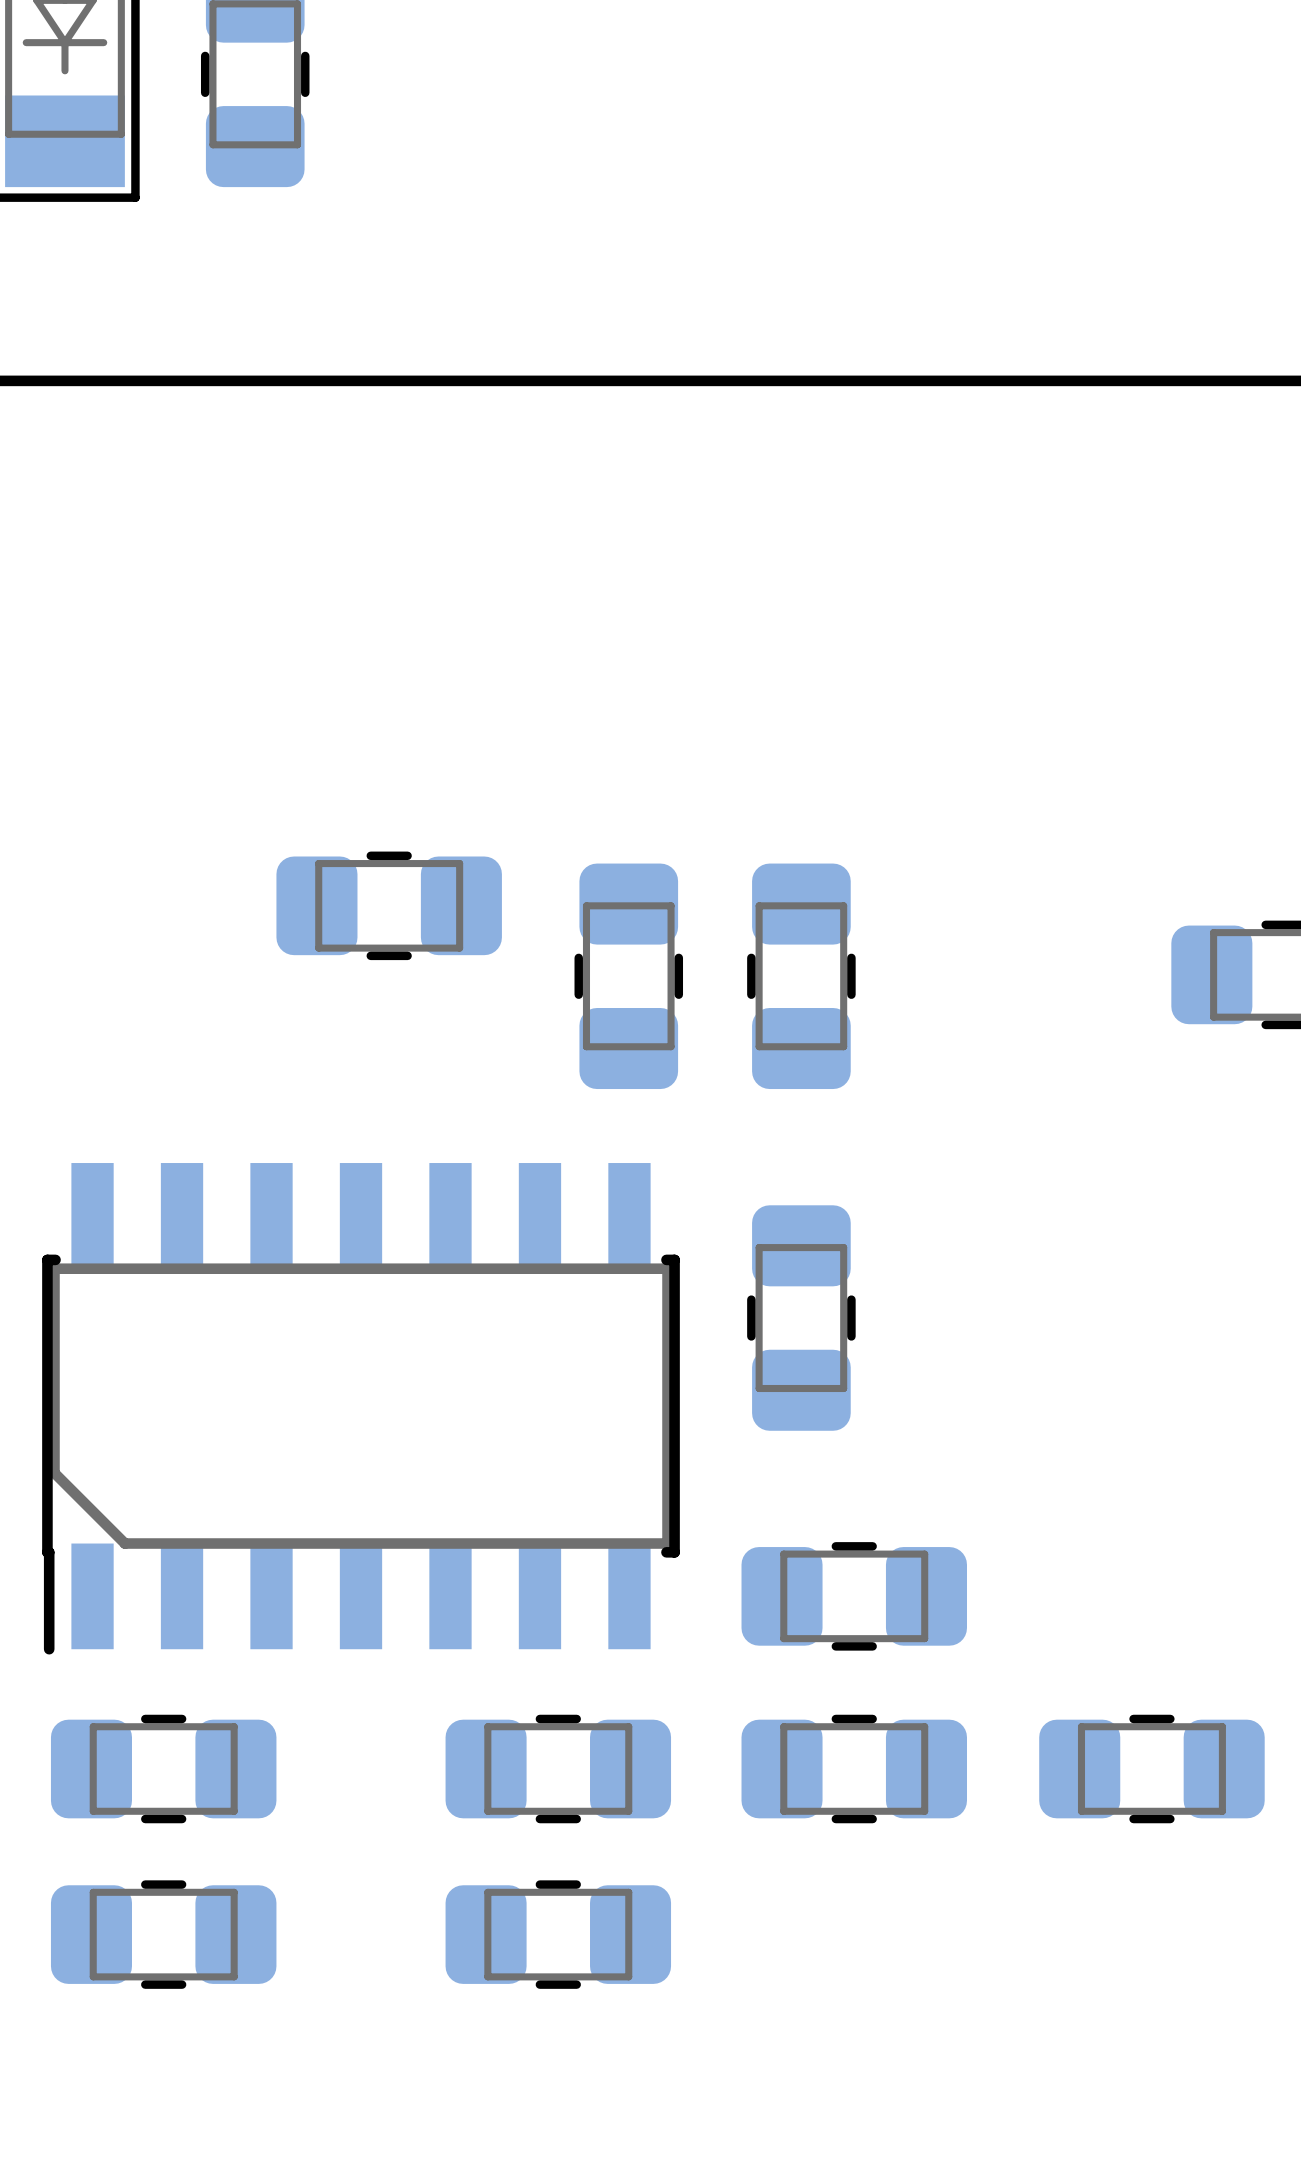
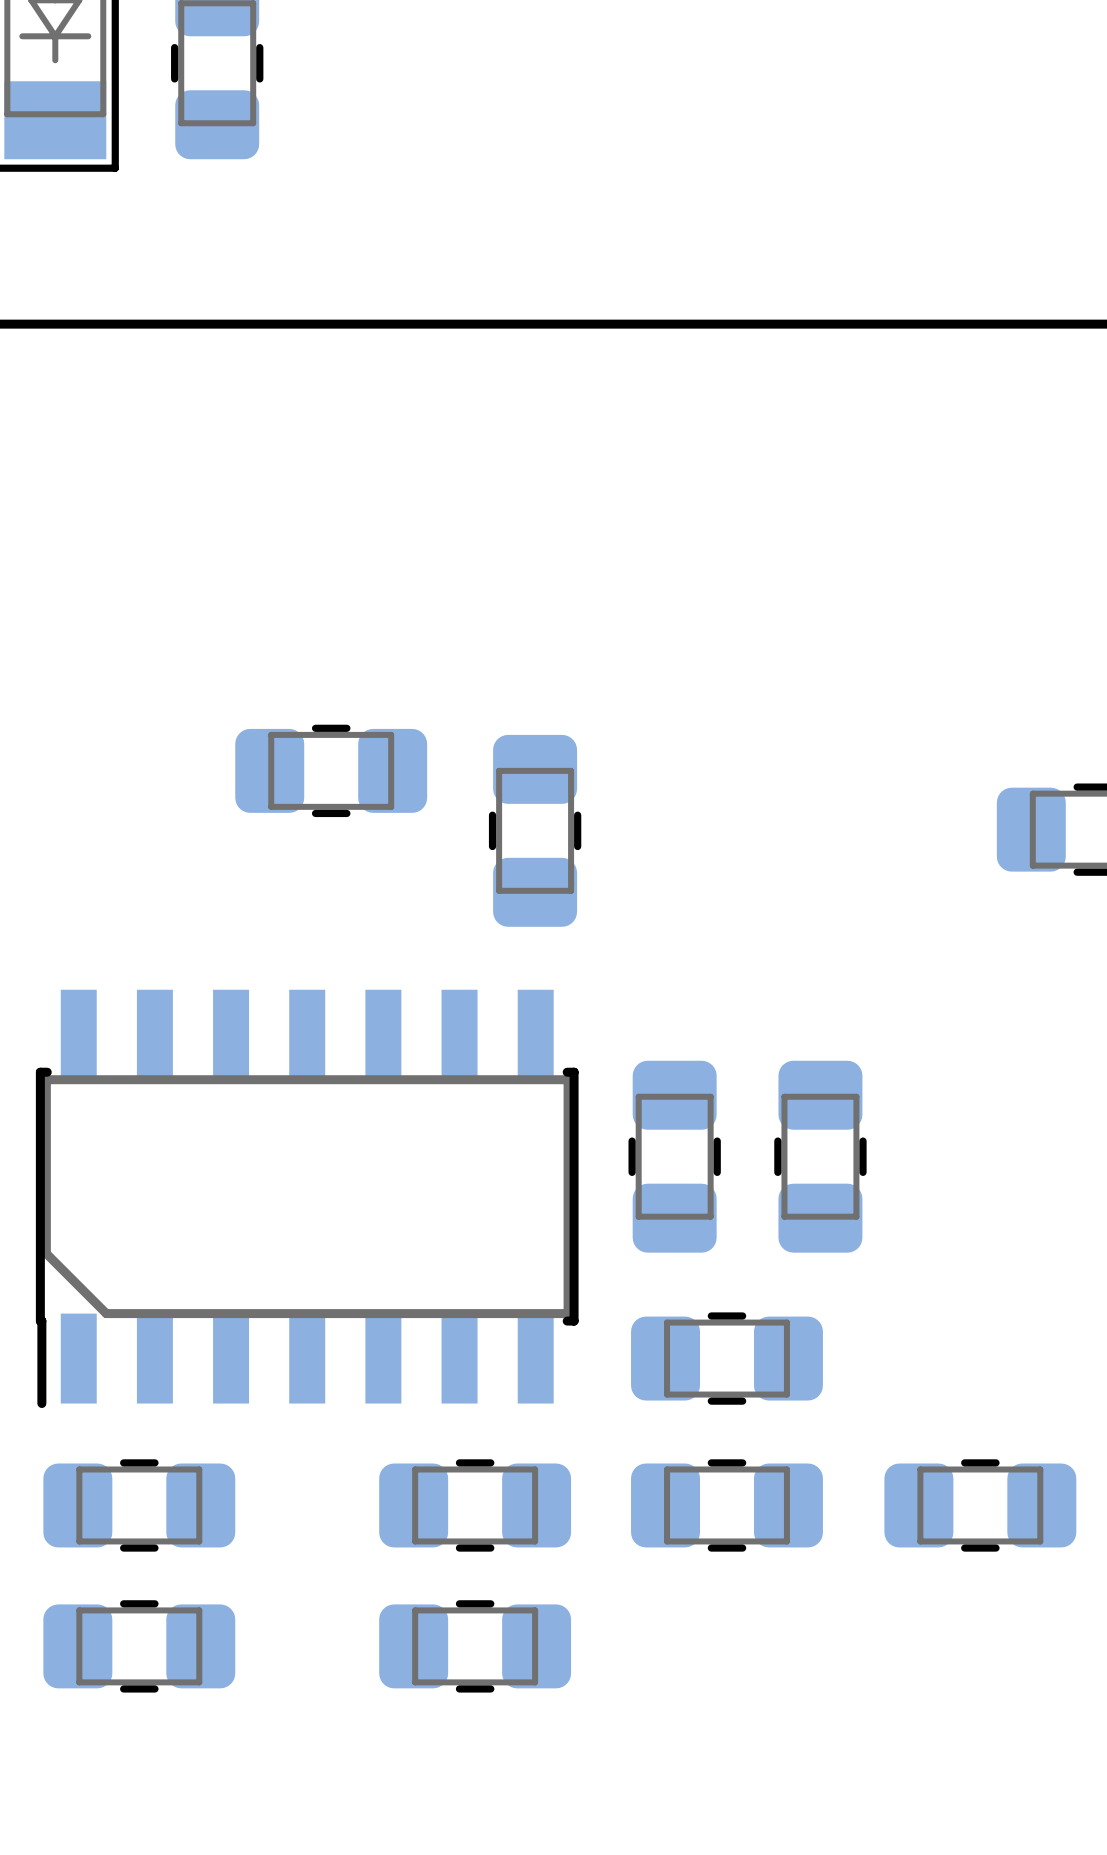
part position: (801, 976) -> (820, 1156)
part position: (801, 1318) -> (674, 1156)

